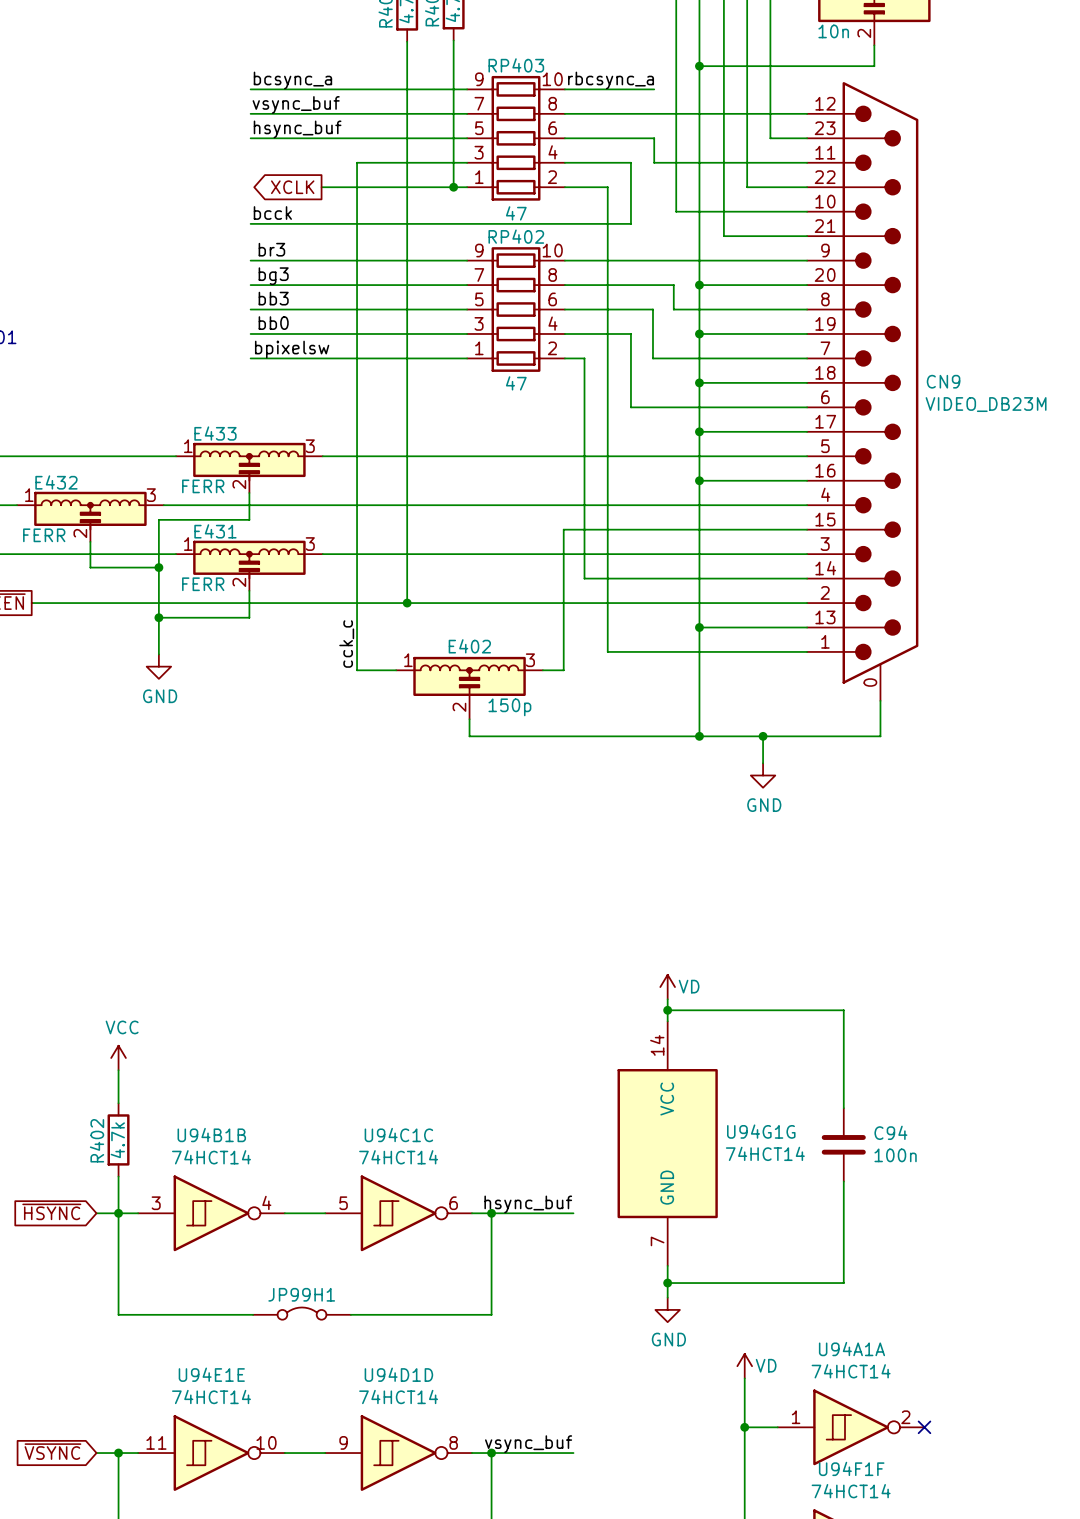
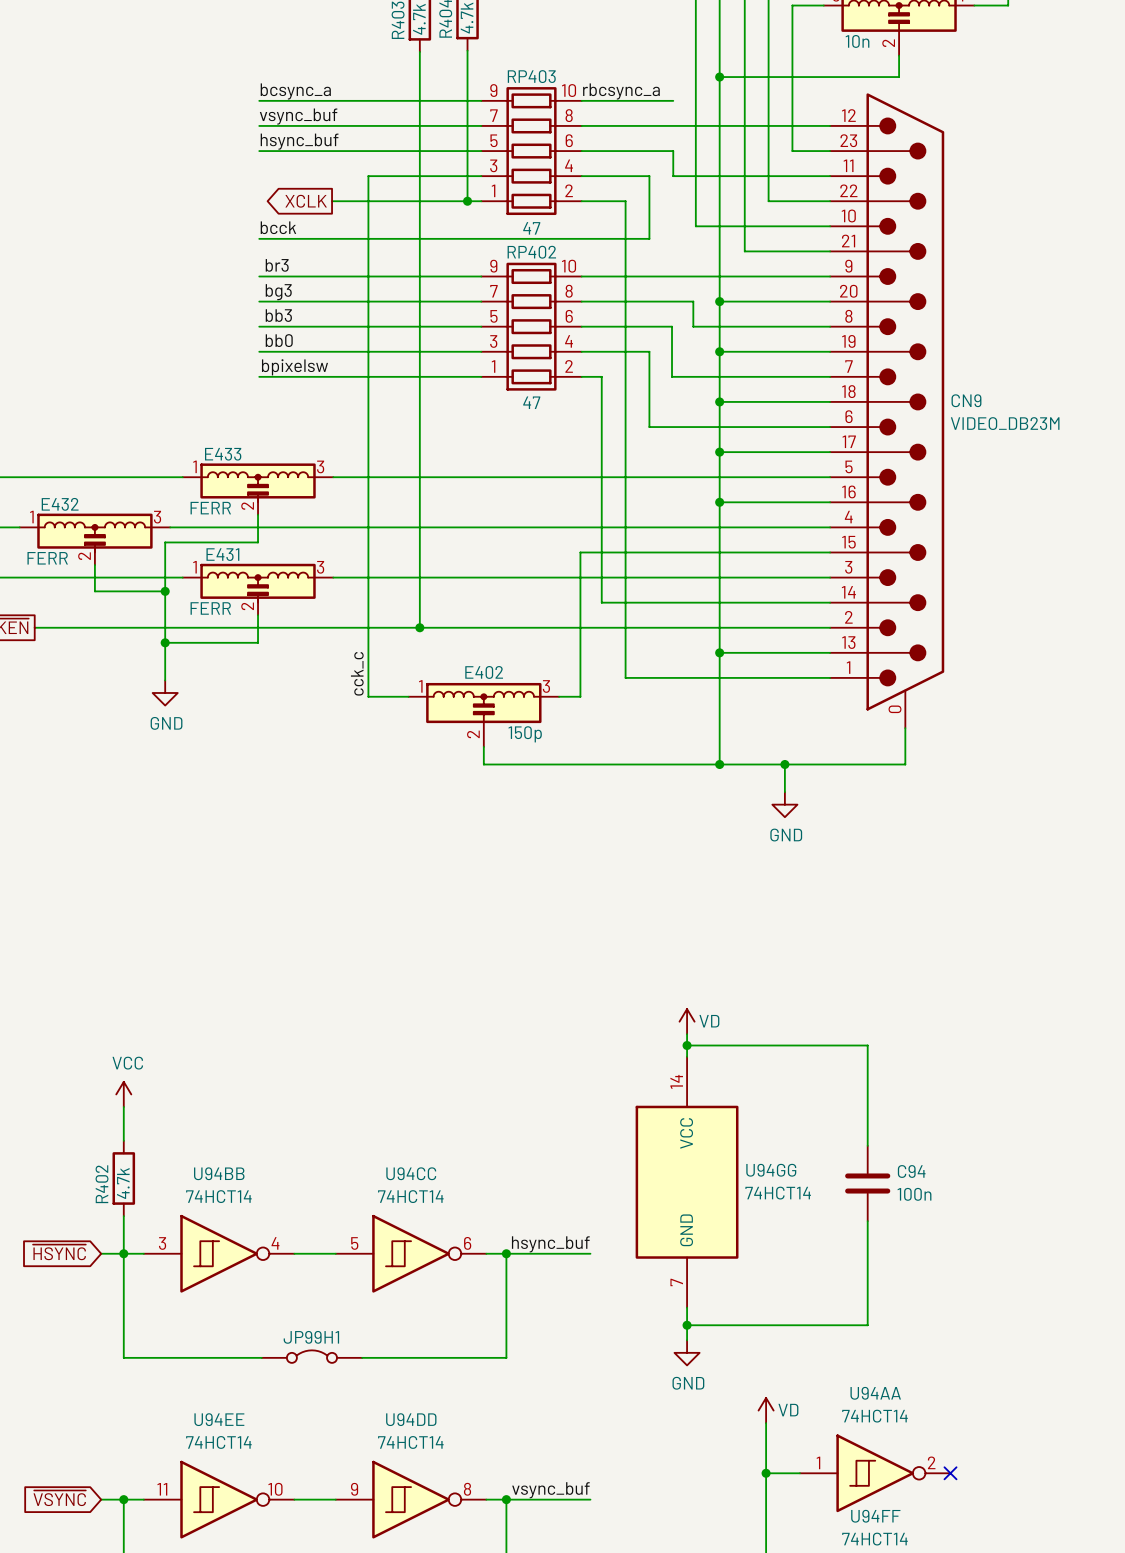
U94G1G name: U94G1G (761, 1131) -> U94GG (771, 1170)
U94B1B name: U94B1B (211, 1135) -> U94BB (219, 1173)
U94C1C name: U94C1C (398, 1135) -> U94CC (411, 1173)
U94A1A name: U94A1A (851, 1349) -> U94AA (875, 1393)
U94E1E name: U94E1E (211, 1374) -> U94EE (219, 1419)
U94D1D name: U94D1D (398, 1374) -> U94DD (411, 1419)
U94F1F name: U94F1F (851, 1468) -> U94FF (875, 1516)

